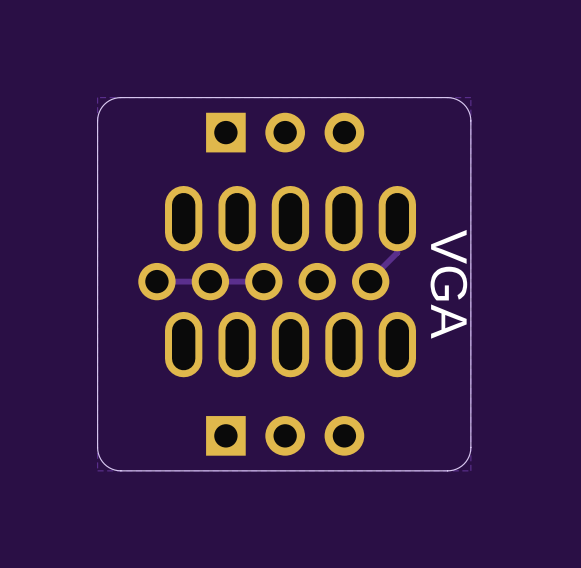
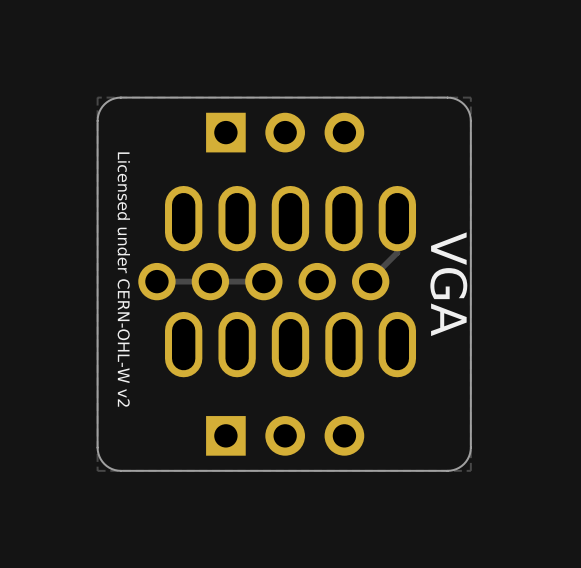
text: none -> Licensed under CERN-OHL-W v2 (123, 279)

